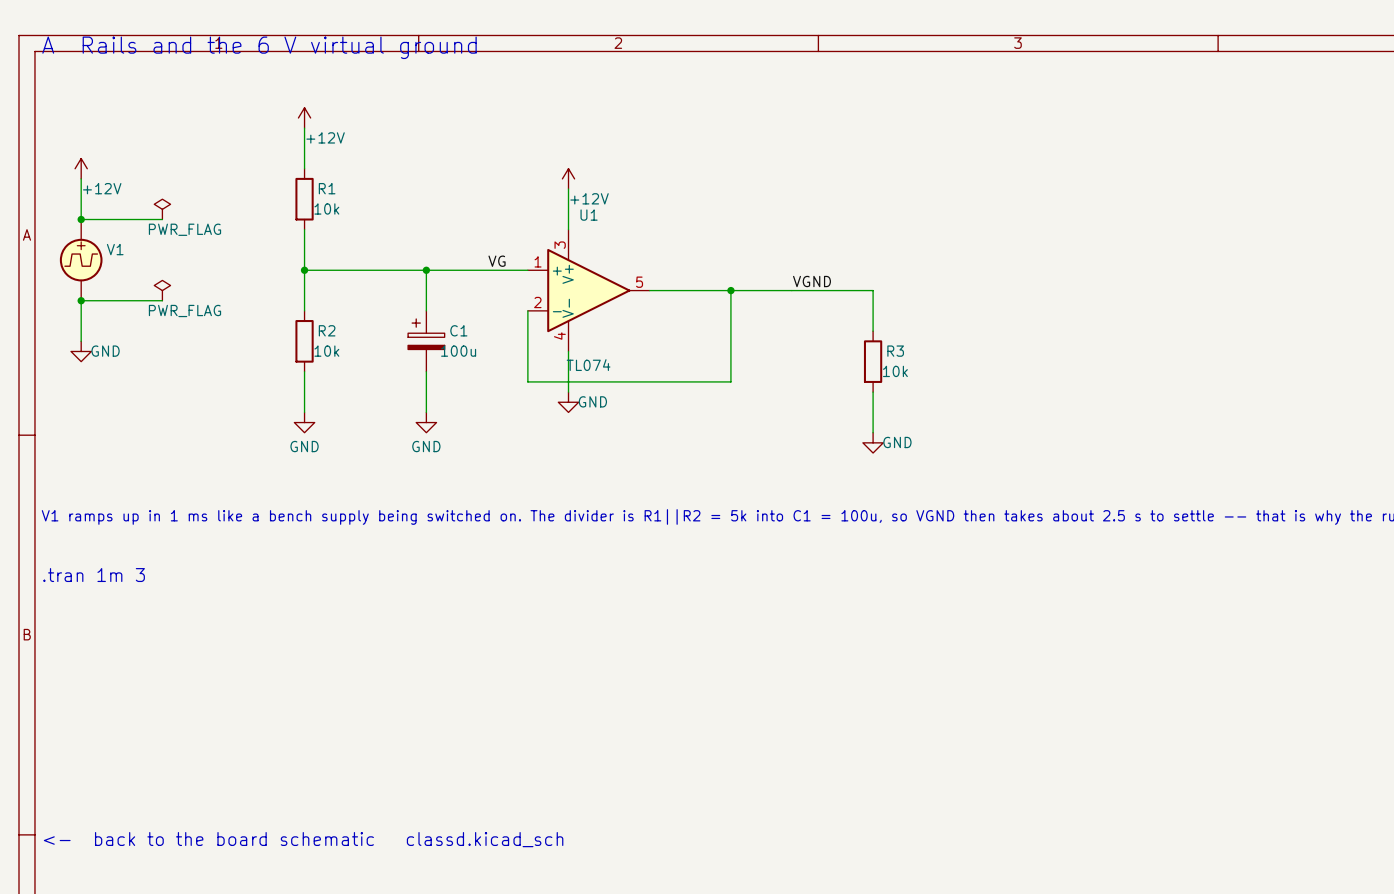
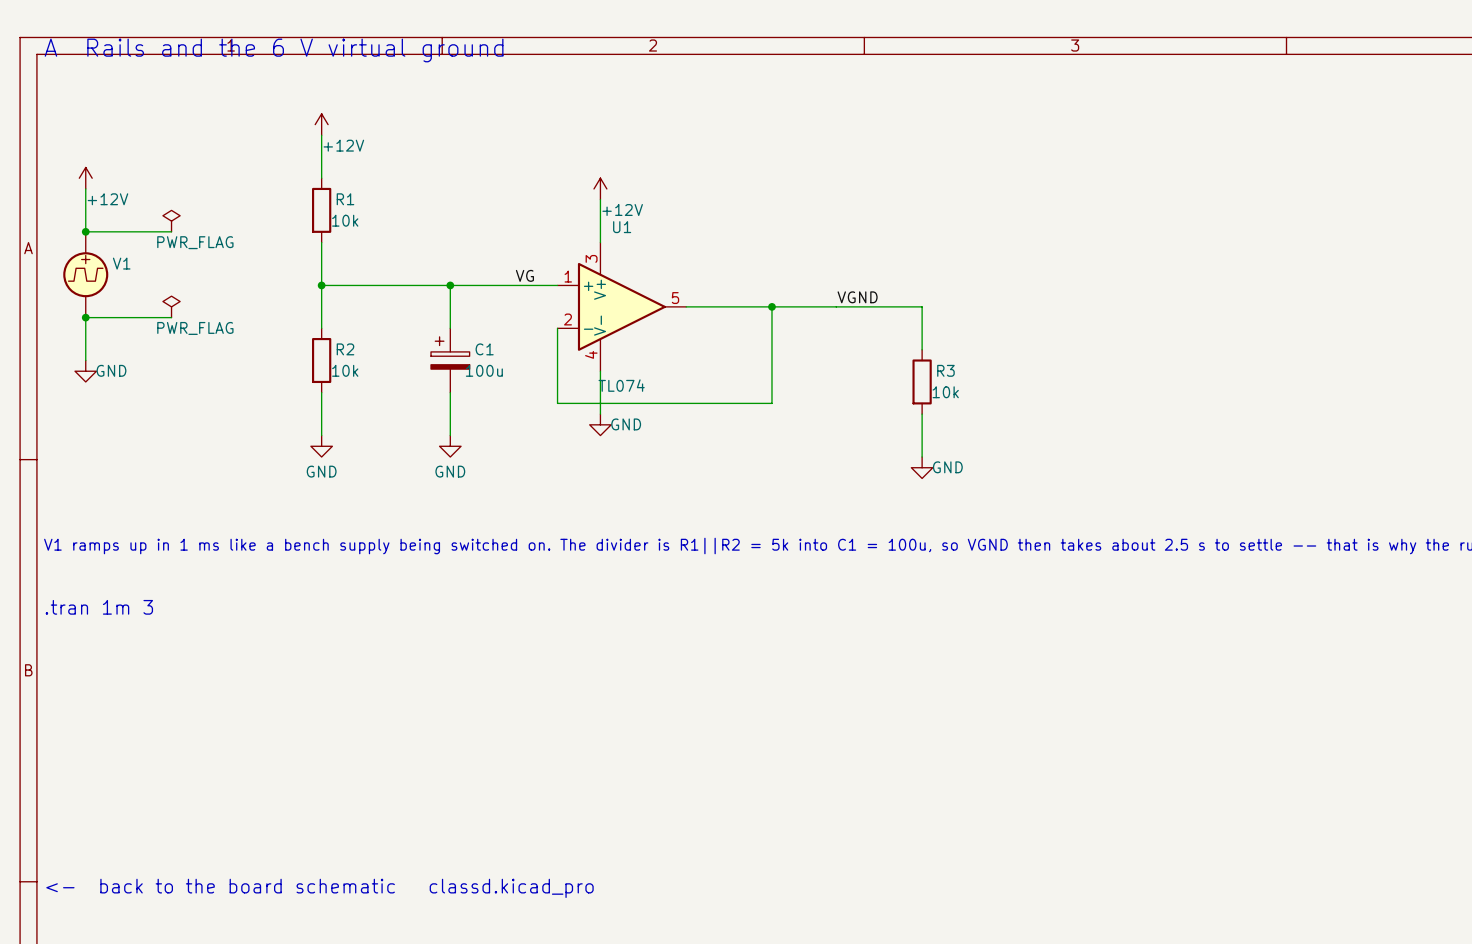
text: <- back to the board schematic classd.kicad_sch (303, 839) -> <- back to the board schematic classd.kicad_pro (319, 888)

